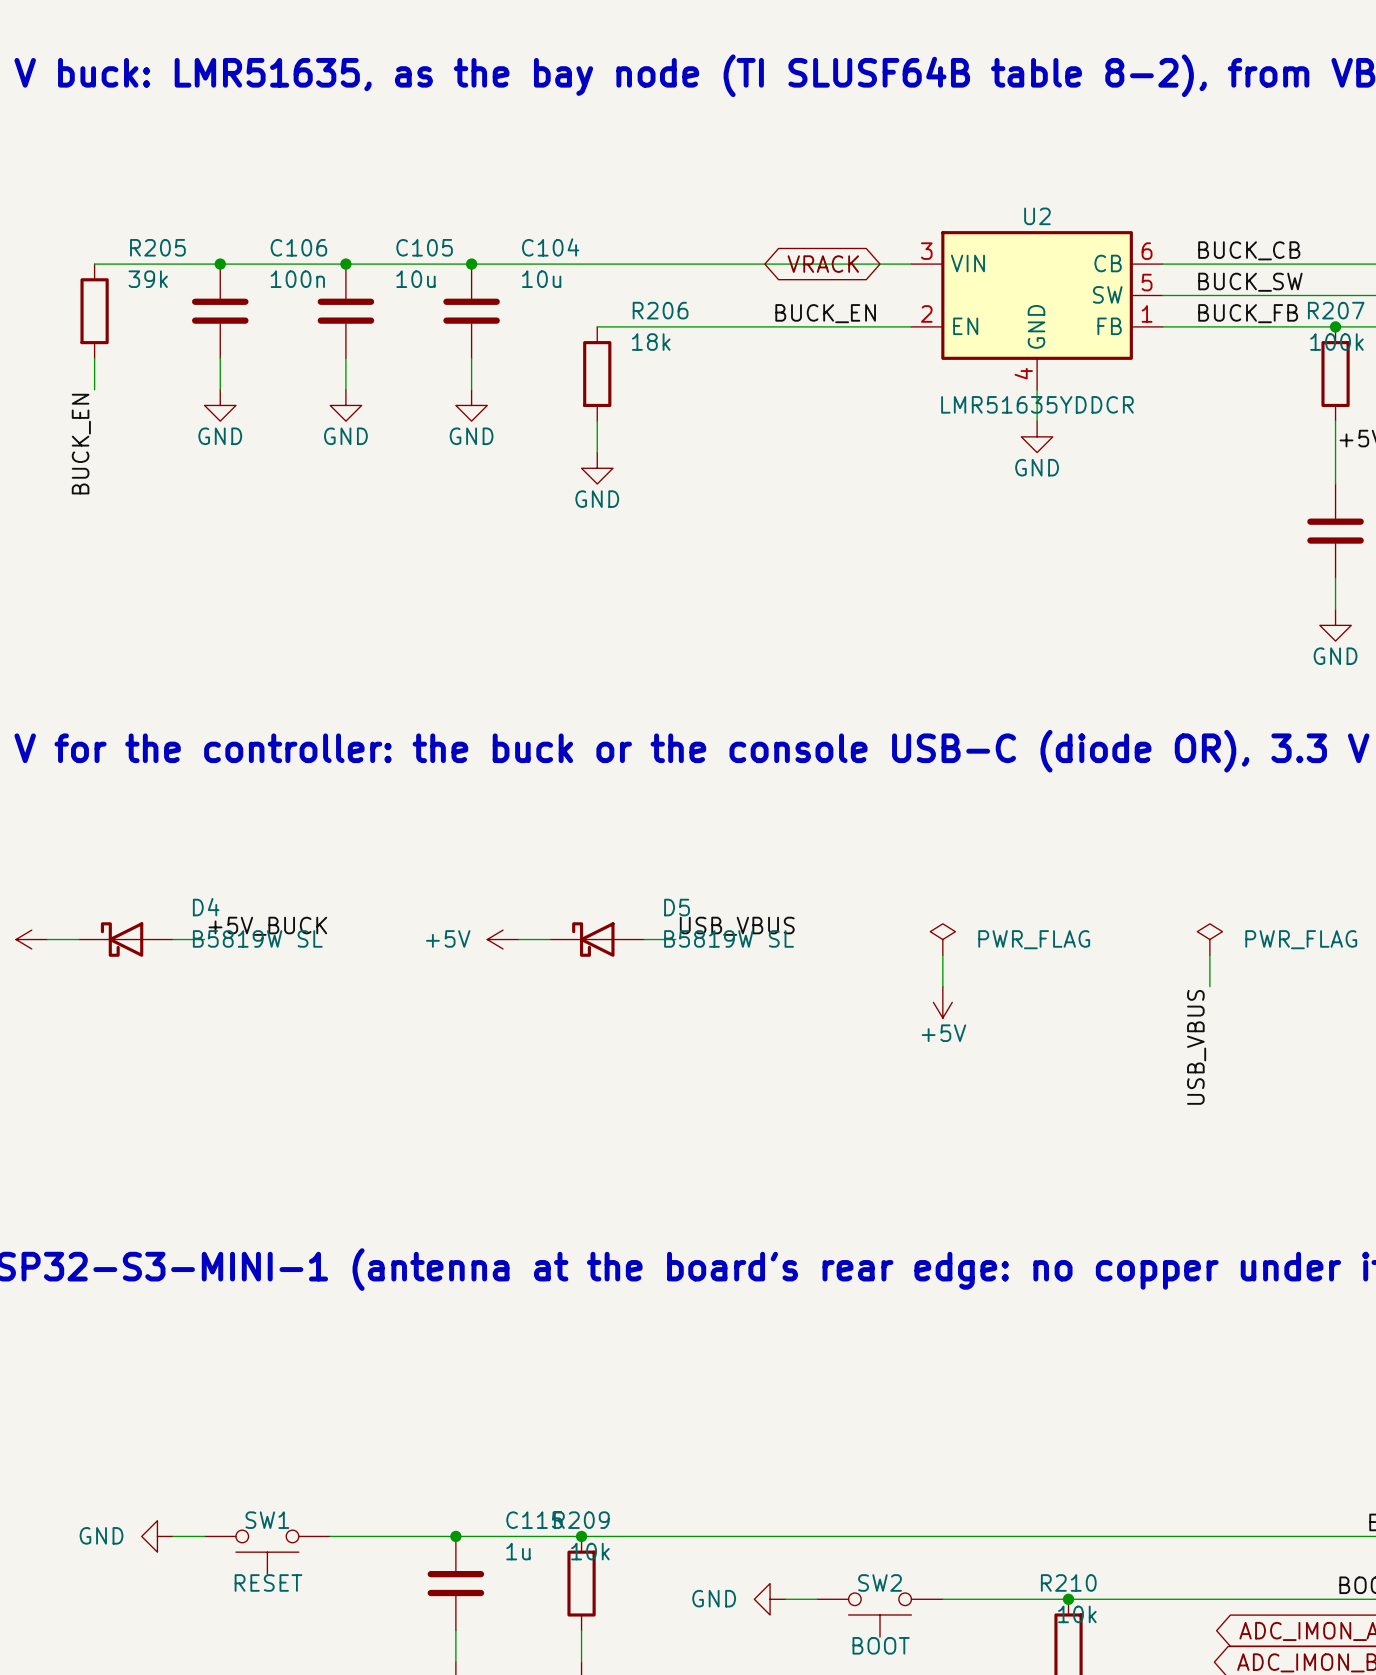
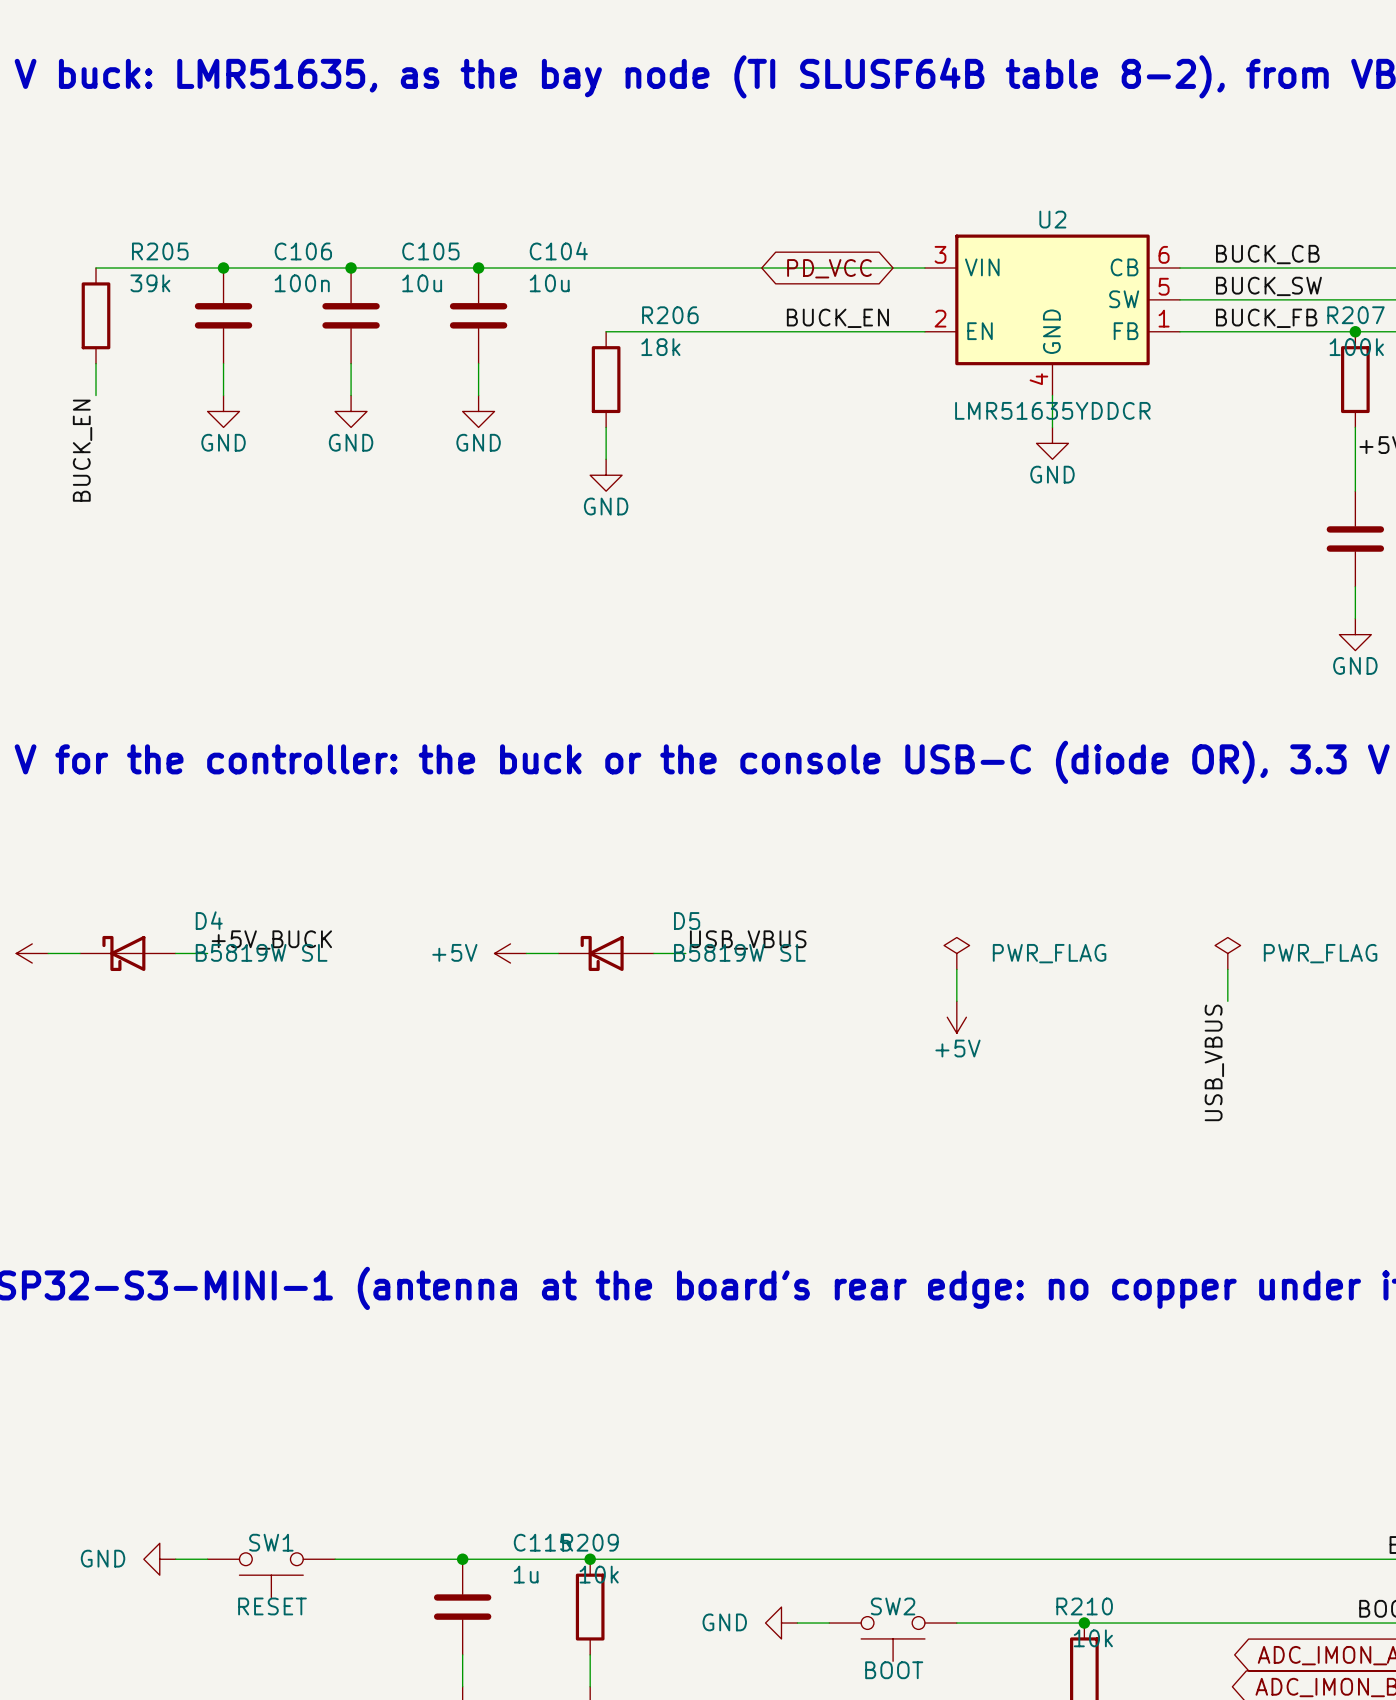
global label: VRACK (823, 264) -> PD_VCC (829, 268)

